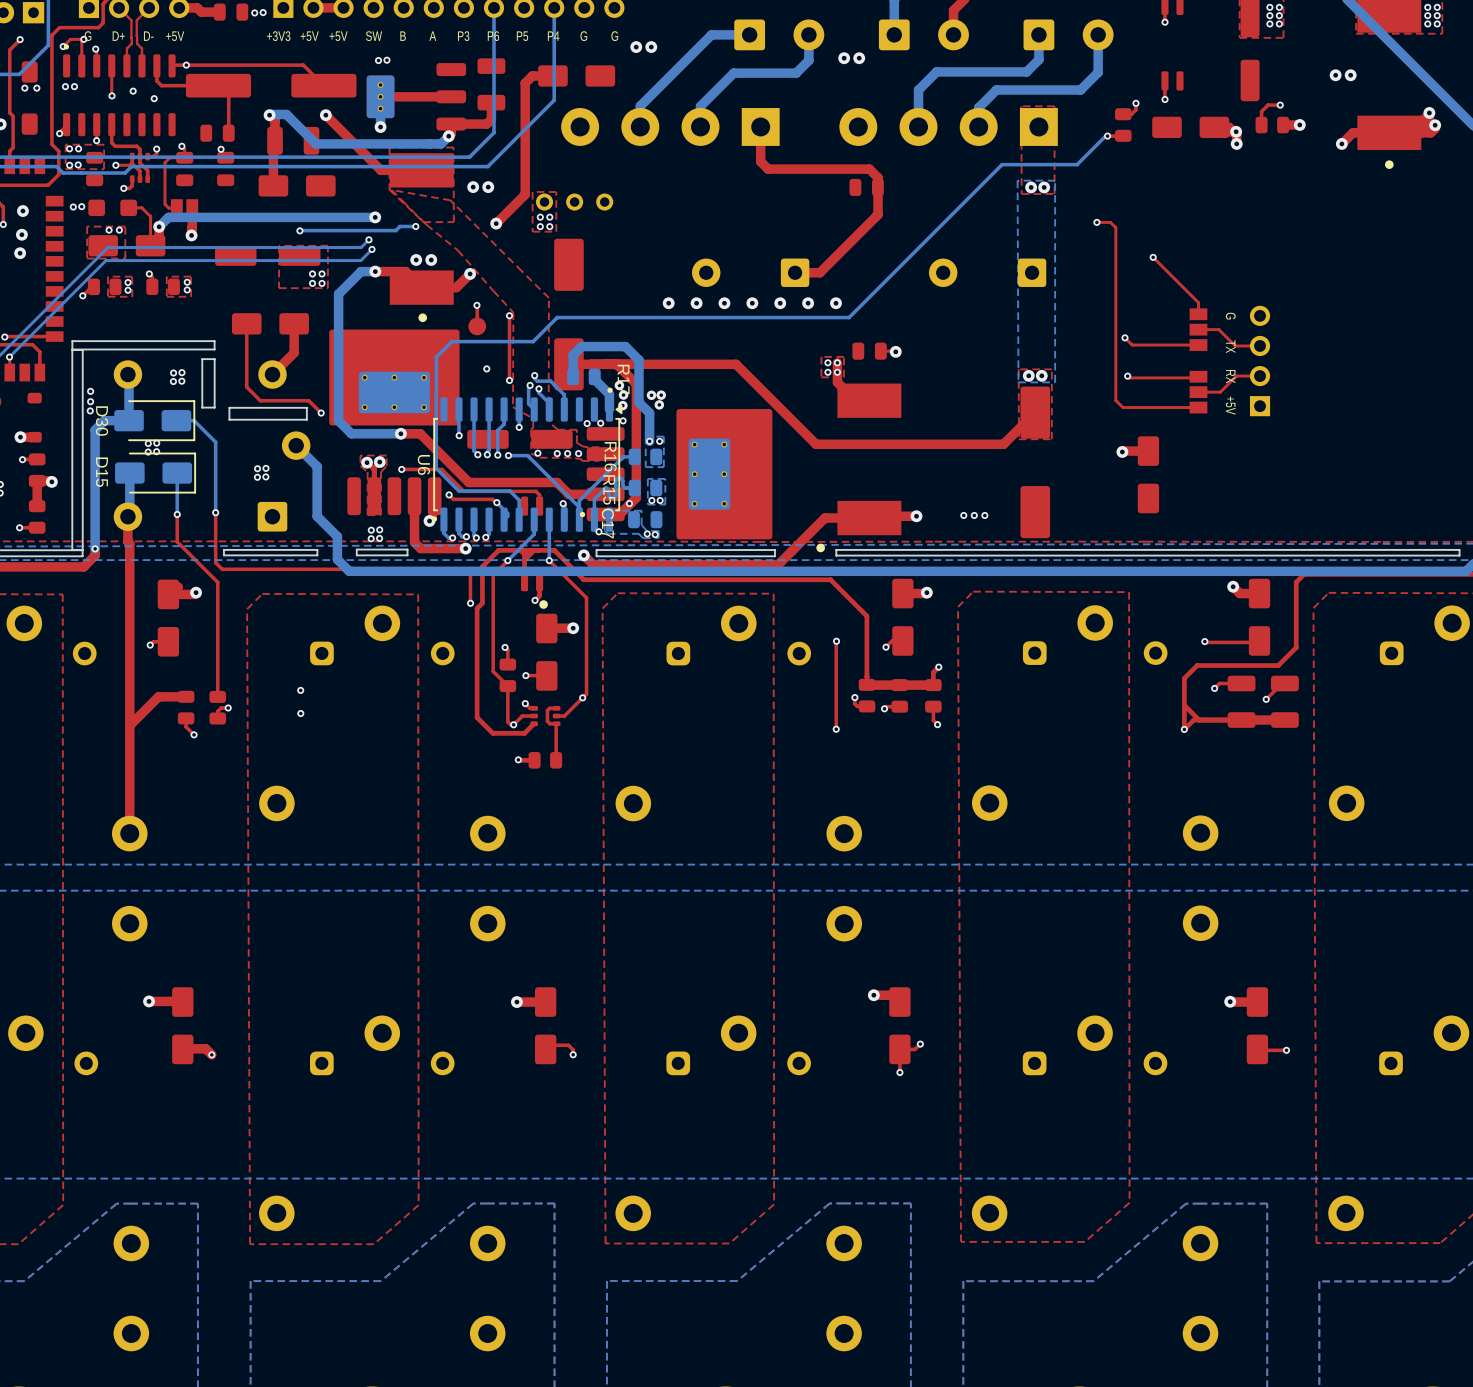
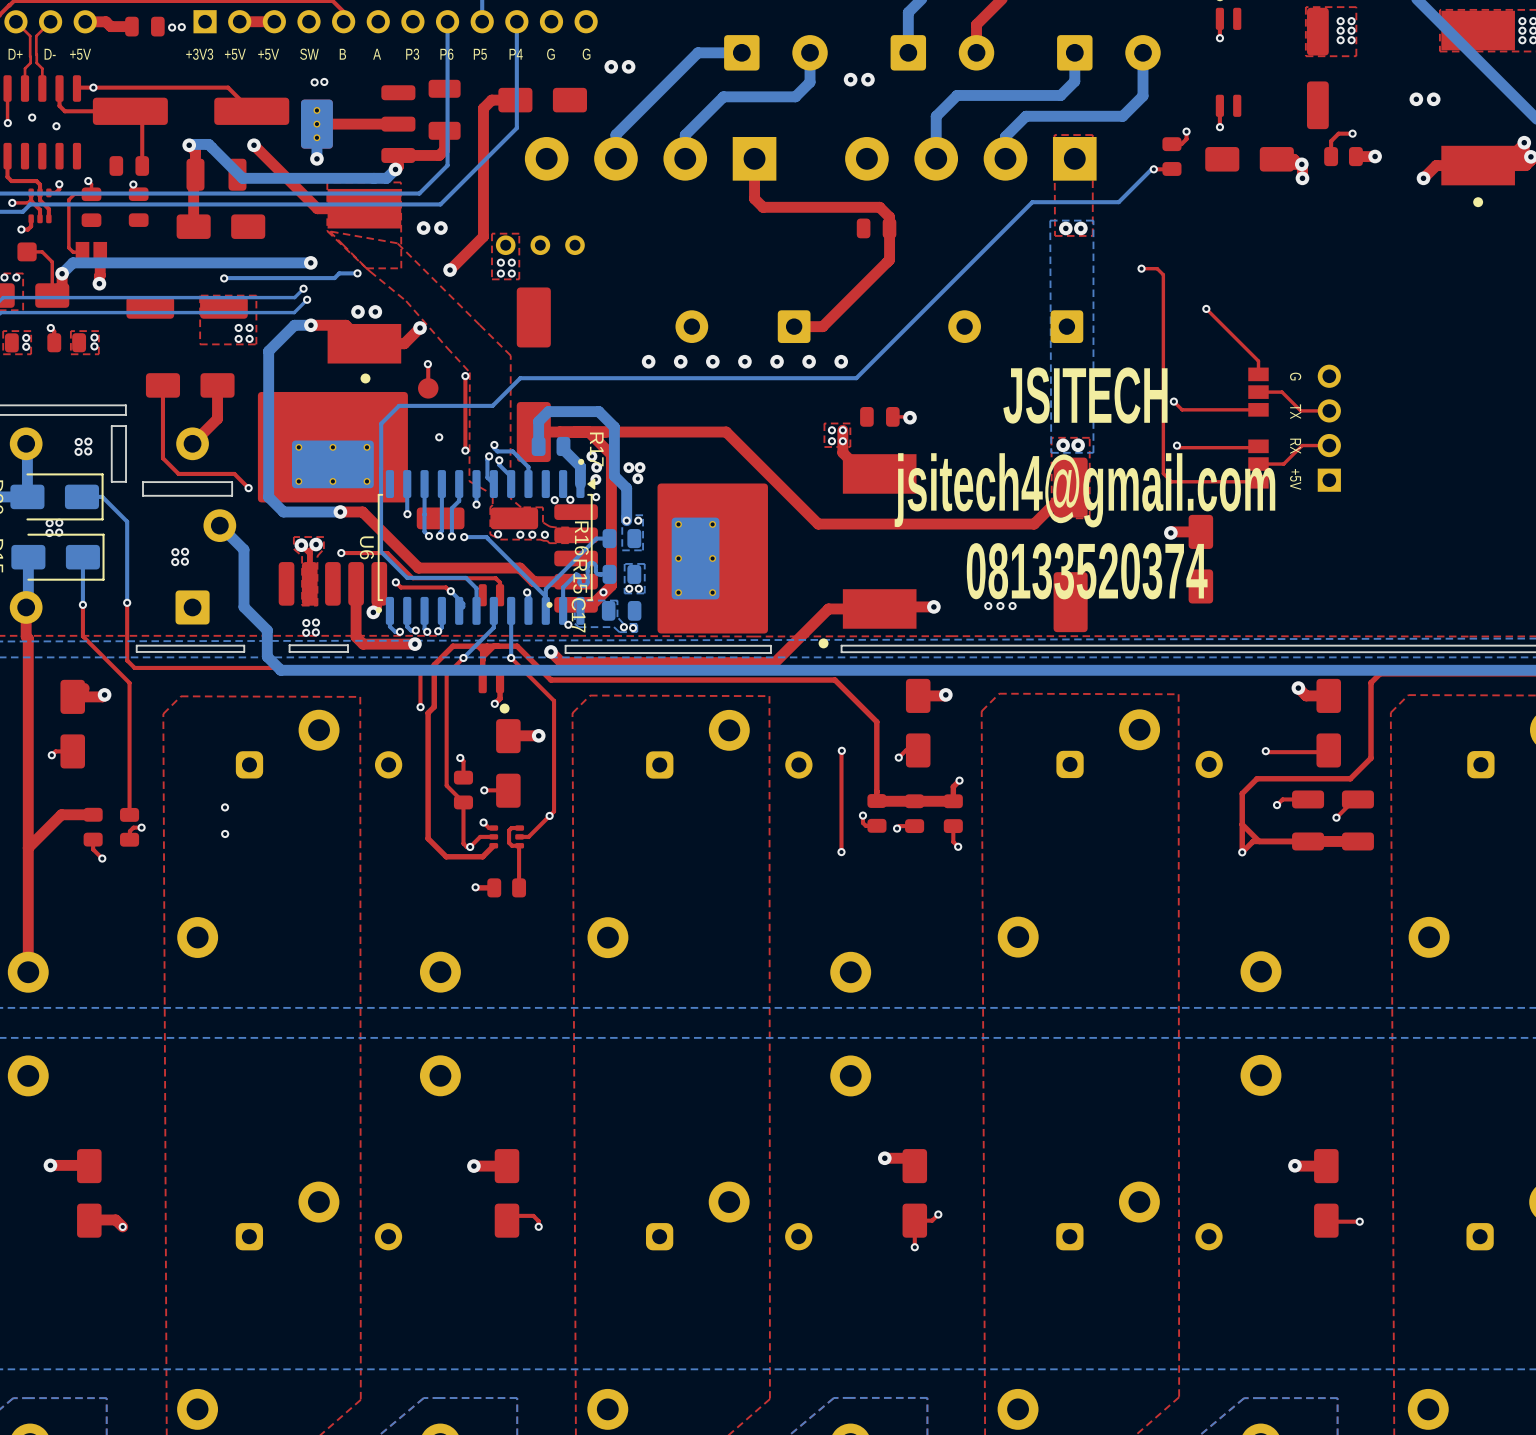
text: none -> JSITECH (1085, 395)
text: none -> jsitech4@gmail.com (1084, 490)
text: none -> 08133520374 (1087, 571)

